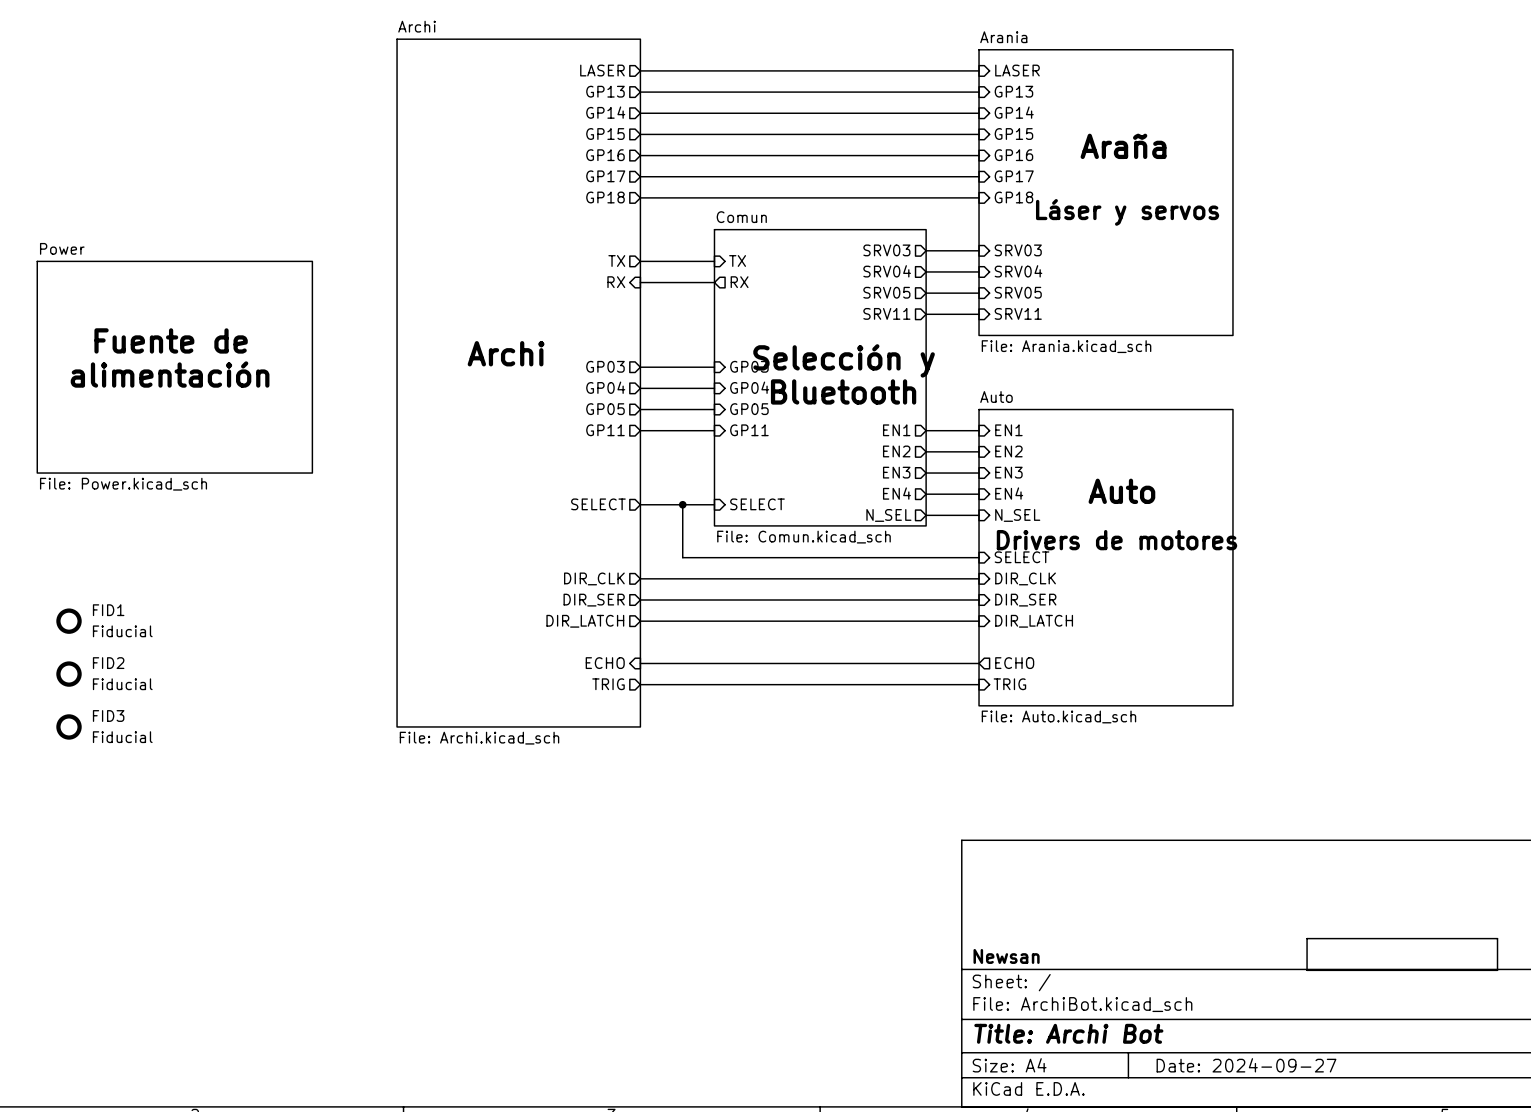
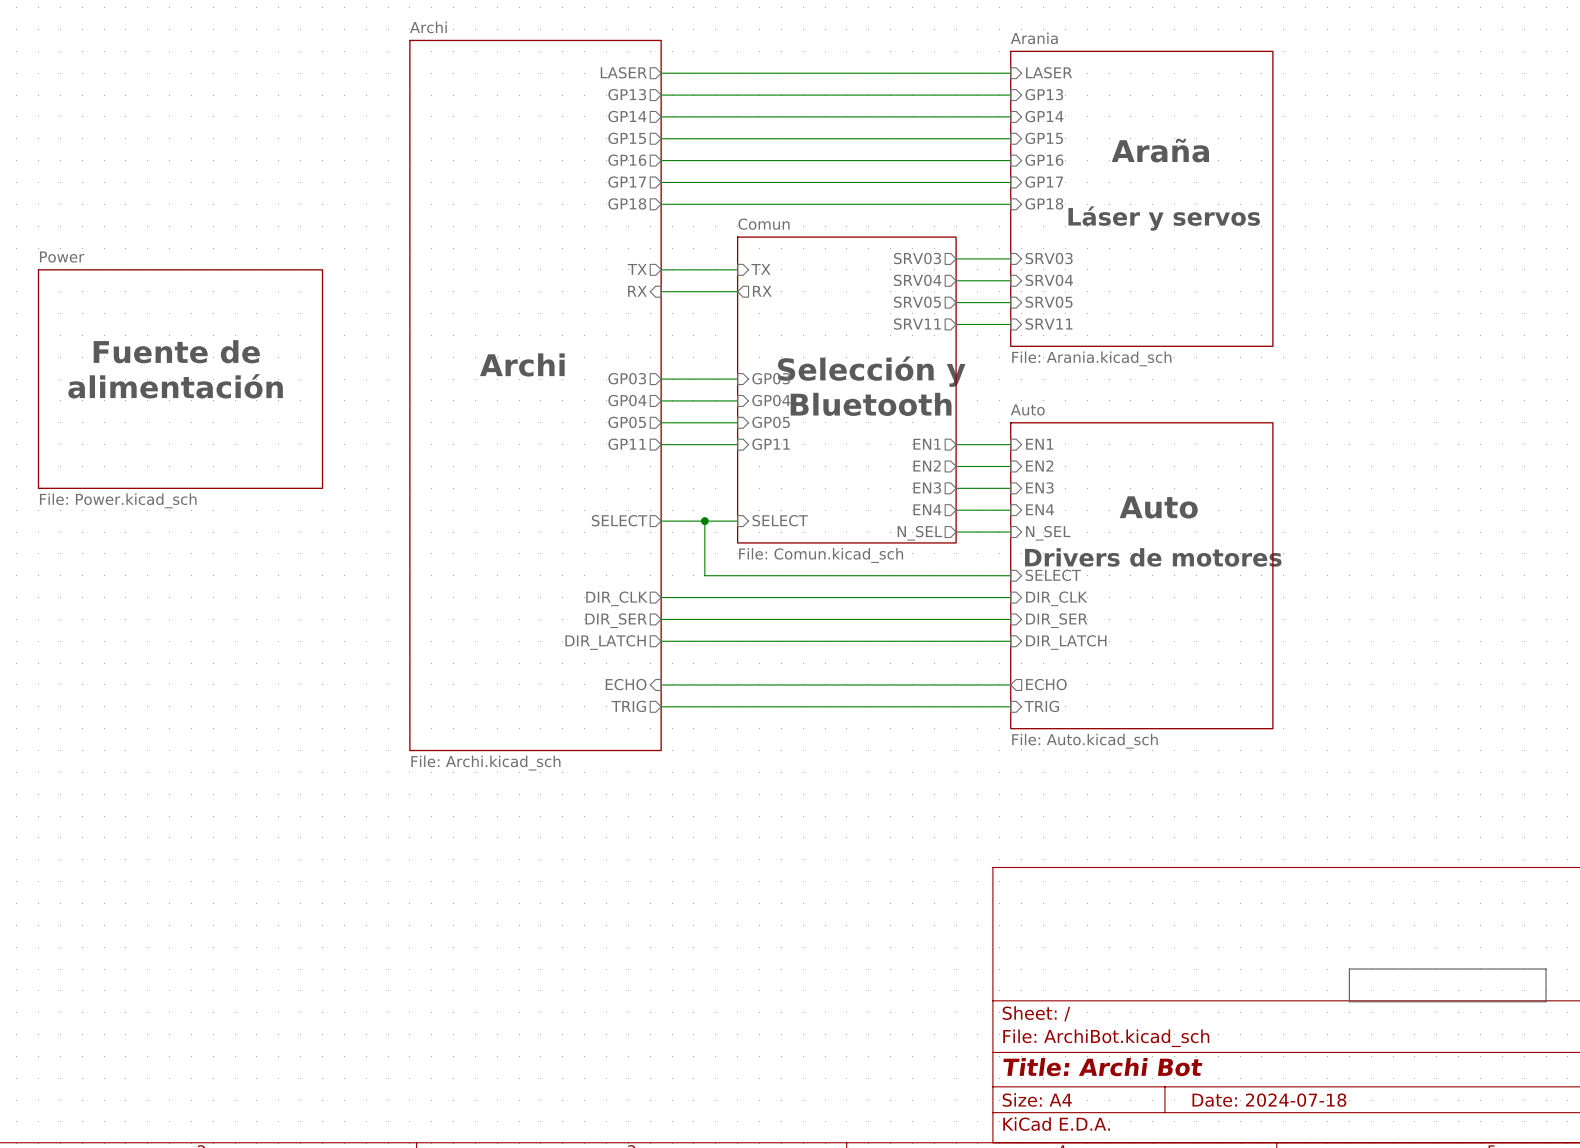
FID1: Fiducial (69, 621) -> none
FID2: Fiducial (69, 674) -> none
FID3: Fiducial (69, 726) -> none
title block: Newsan (1006, 956) -> none
title block: Date: 2024-09-27 (1246, 1065) -> Date: 2024-07-18 (1269, 1100)

